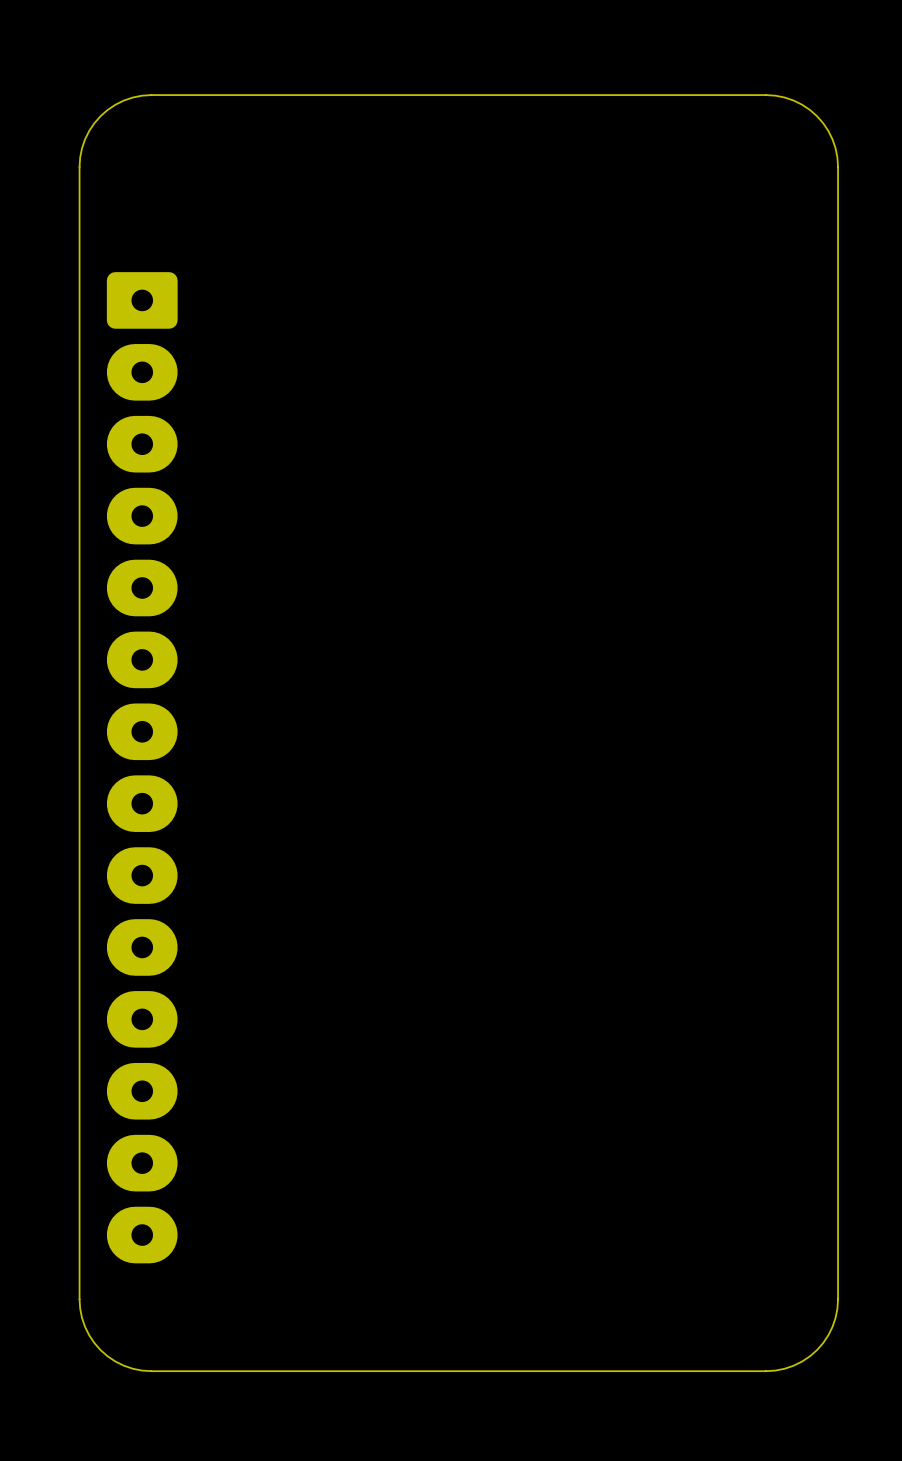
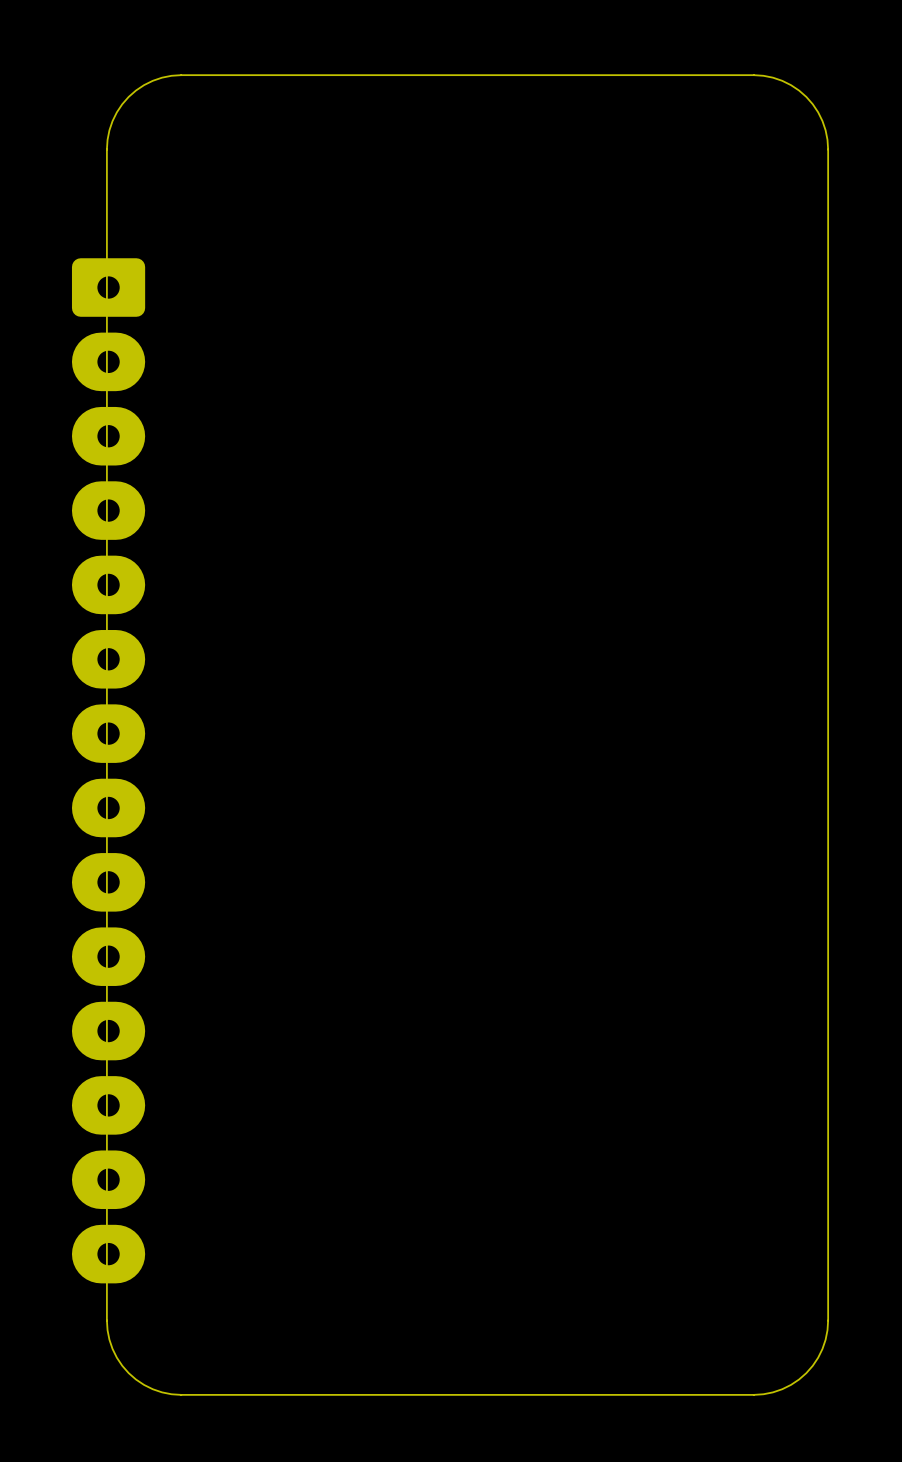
board edge: (212, 95) (142, 95) (115, 104) (100, 116) (89, 131) (82, 148) (79, 166) (80, 1308) (85, 1326) (94, 1343) (107, 1356) (123, 1365) (151, 1371) (212, 1371) -> (181, 75) (152, 80) (128, 96) (112, 121) (106, 149) (106, 1320) (112, 1349) (128, 1373) (152, 1389) (181, 1394)

